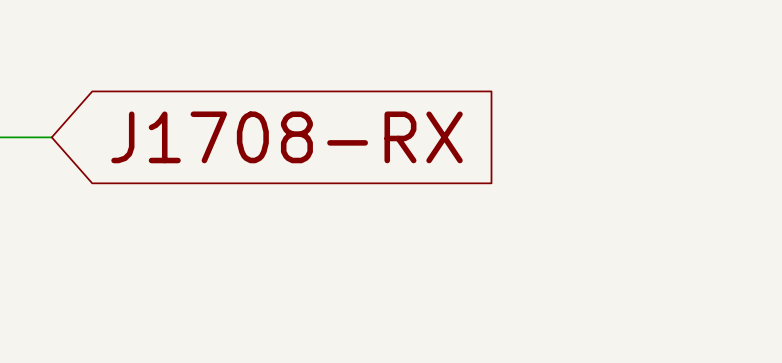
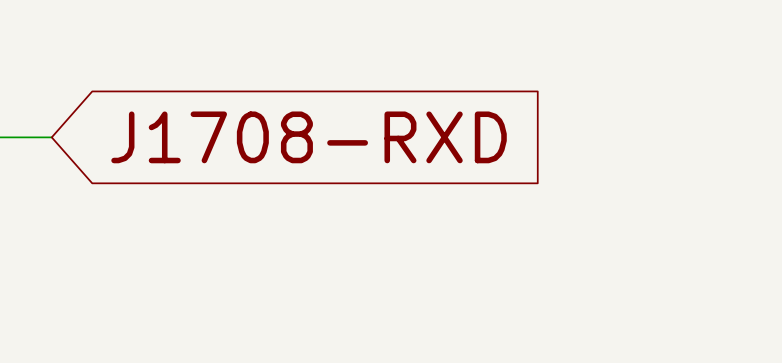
global label: J1708-RX (287, 137) -> J1708-RXD (309, 137)

